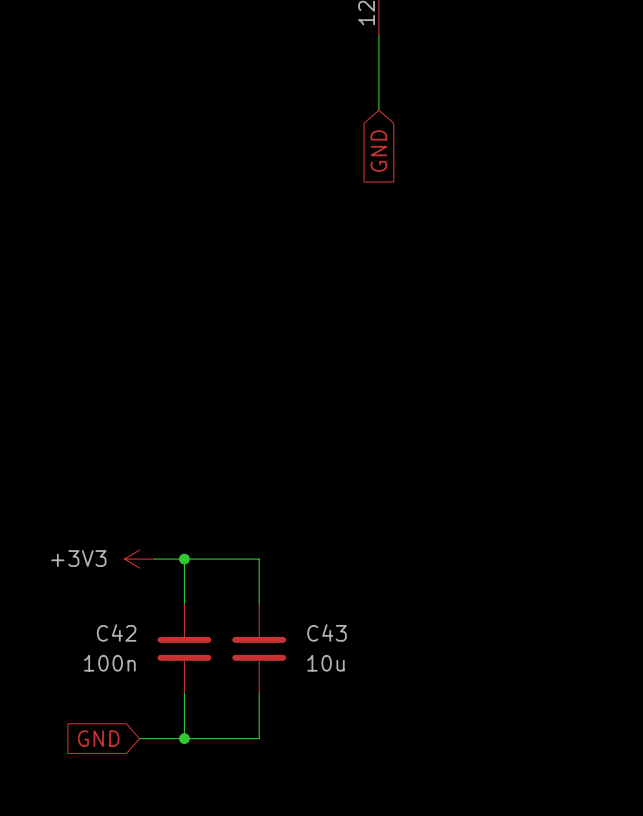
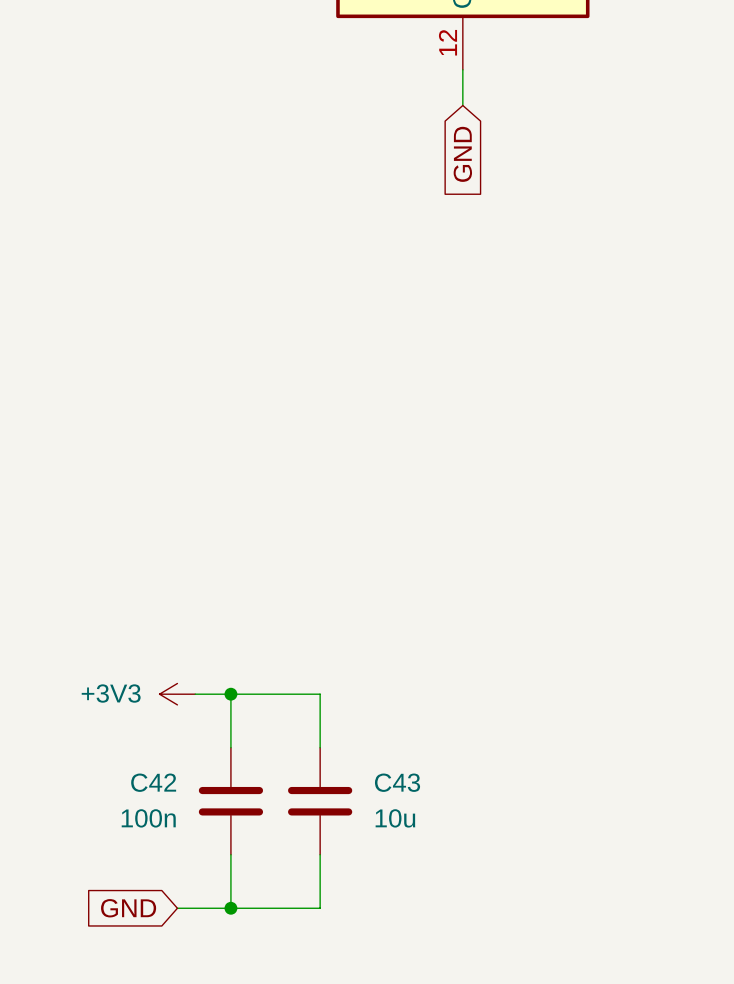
wire: (378, 65) (378, 110) -> none
global label position: GND (378, 151) -> GND (462, 154)

